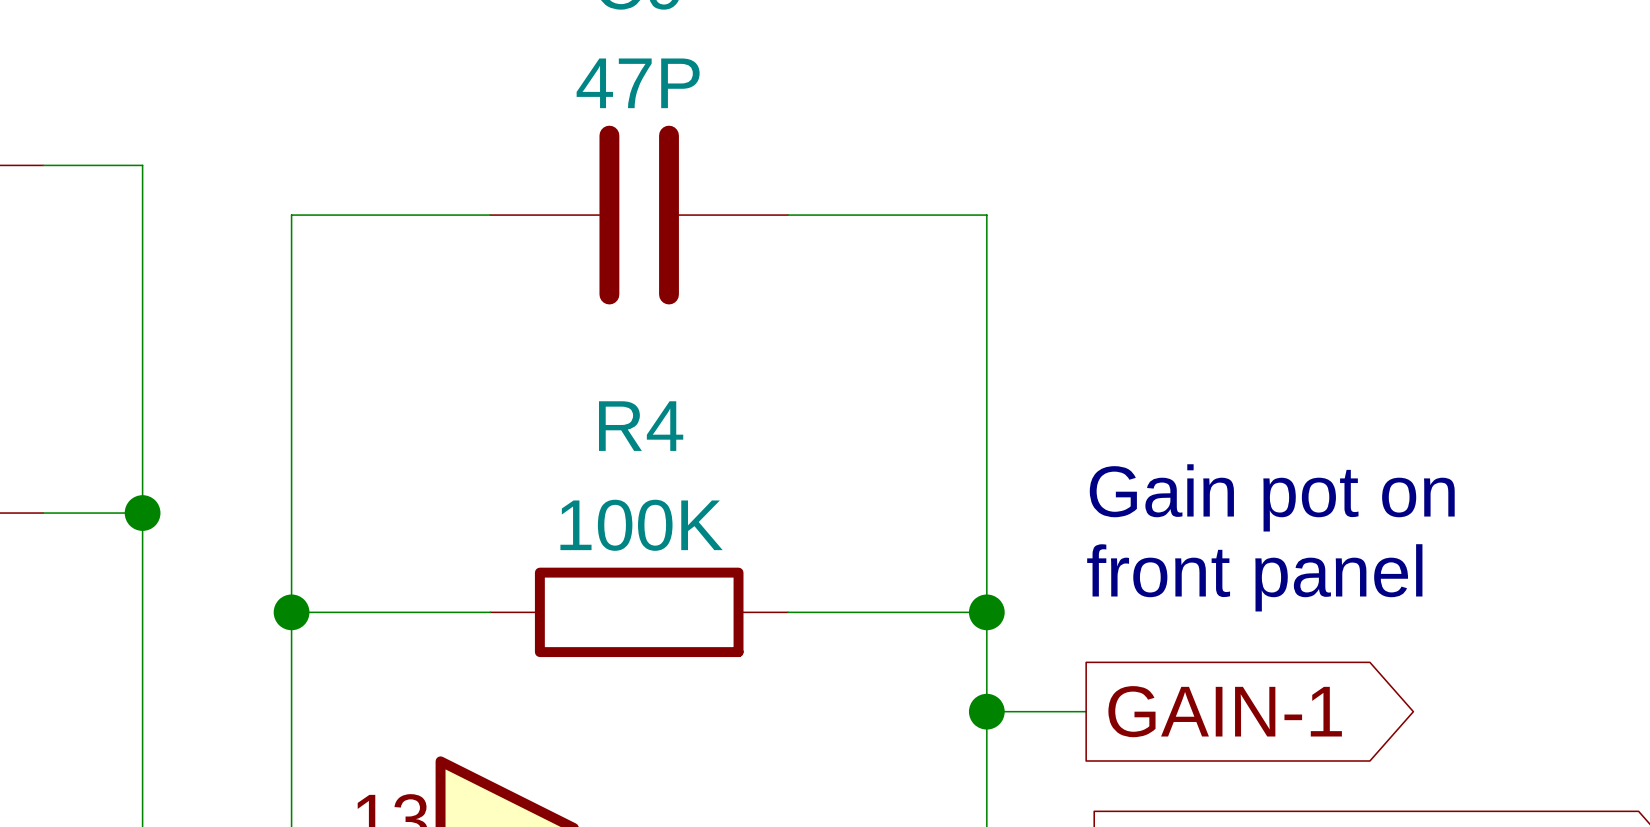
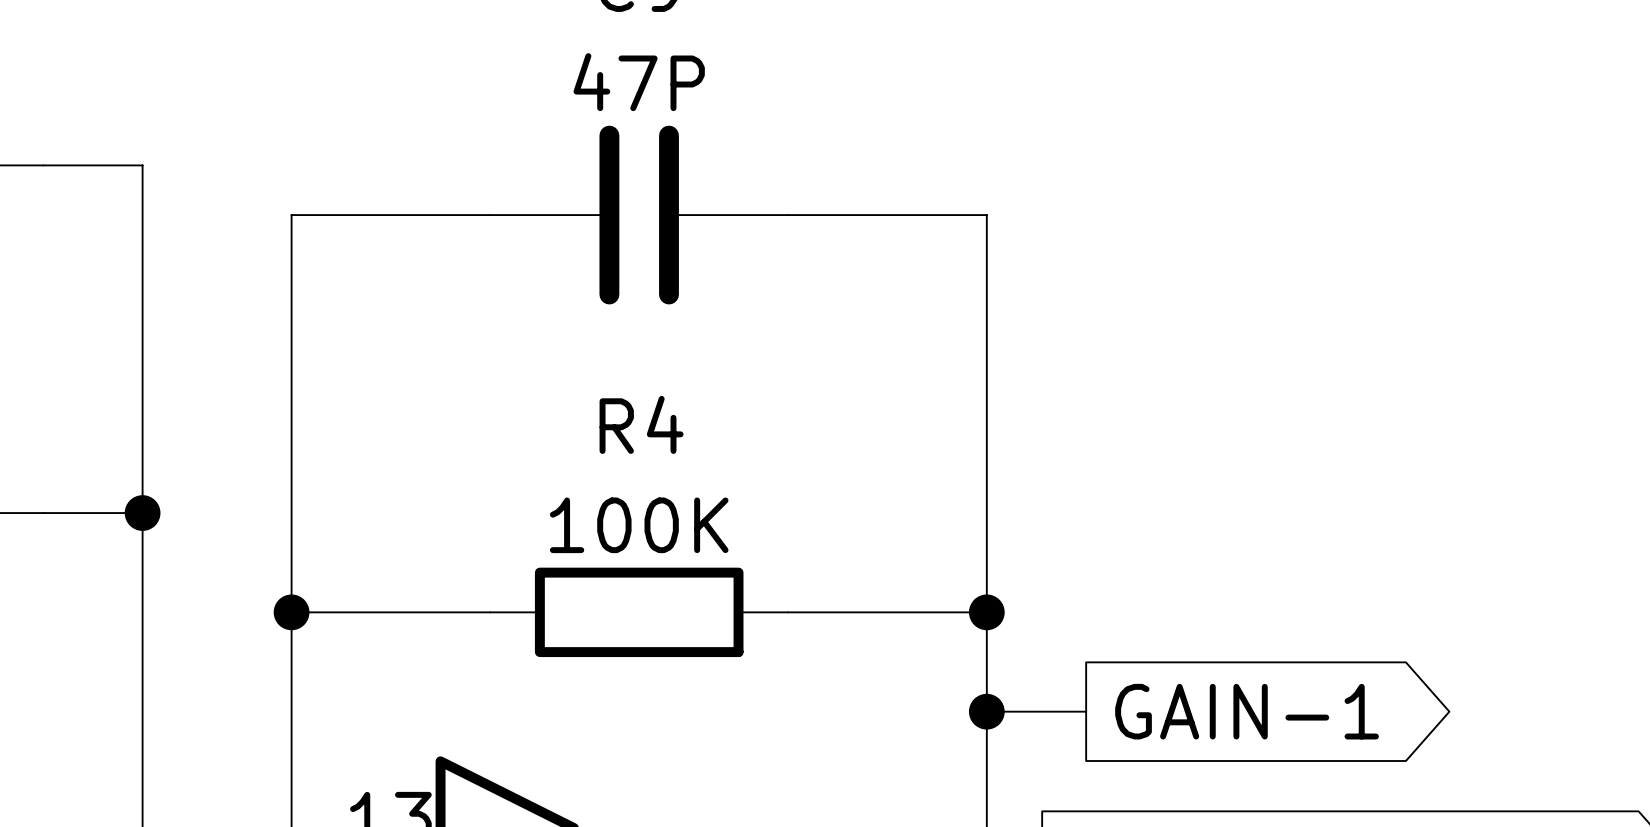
text: Gain pot on (1272, 497) -> none
text: front panel (1254, 577) -> none

